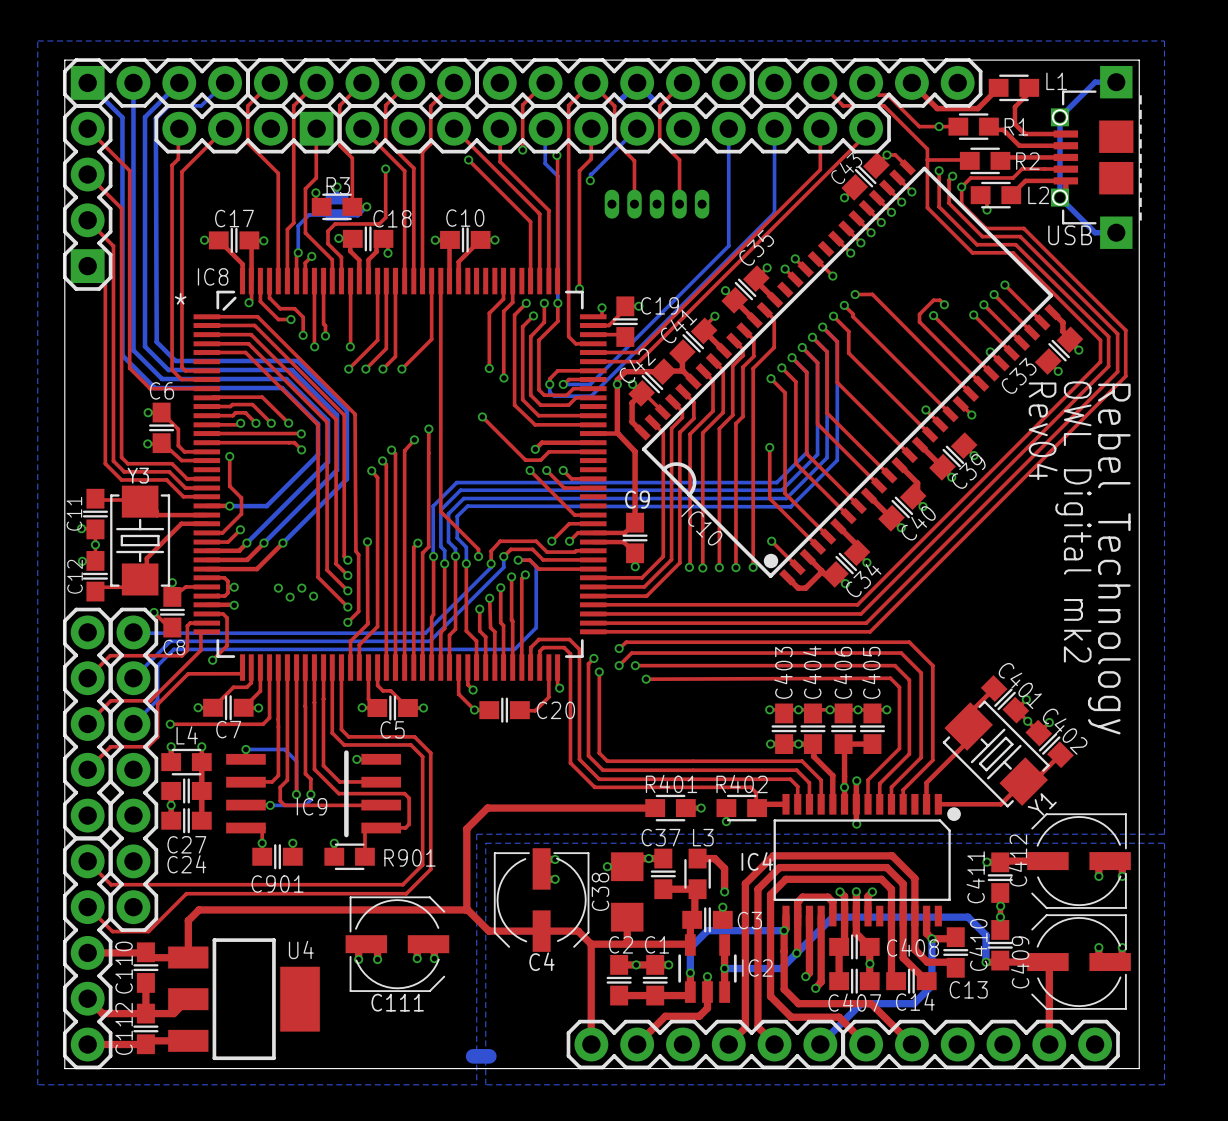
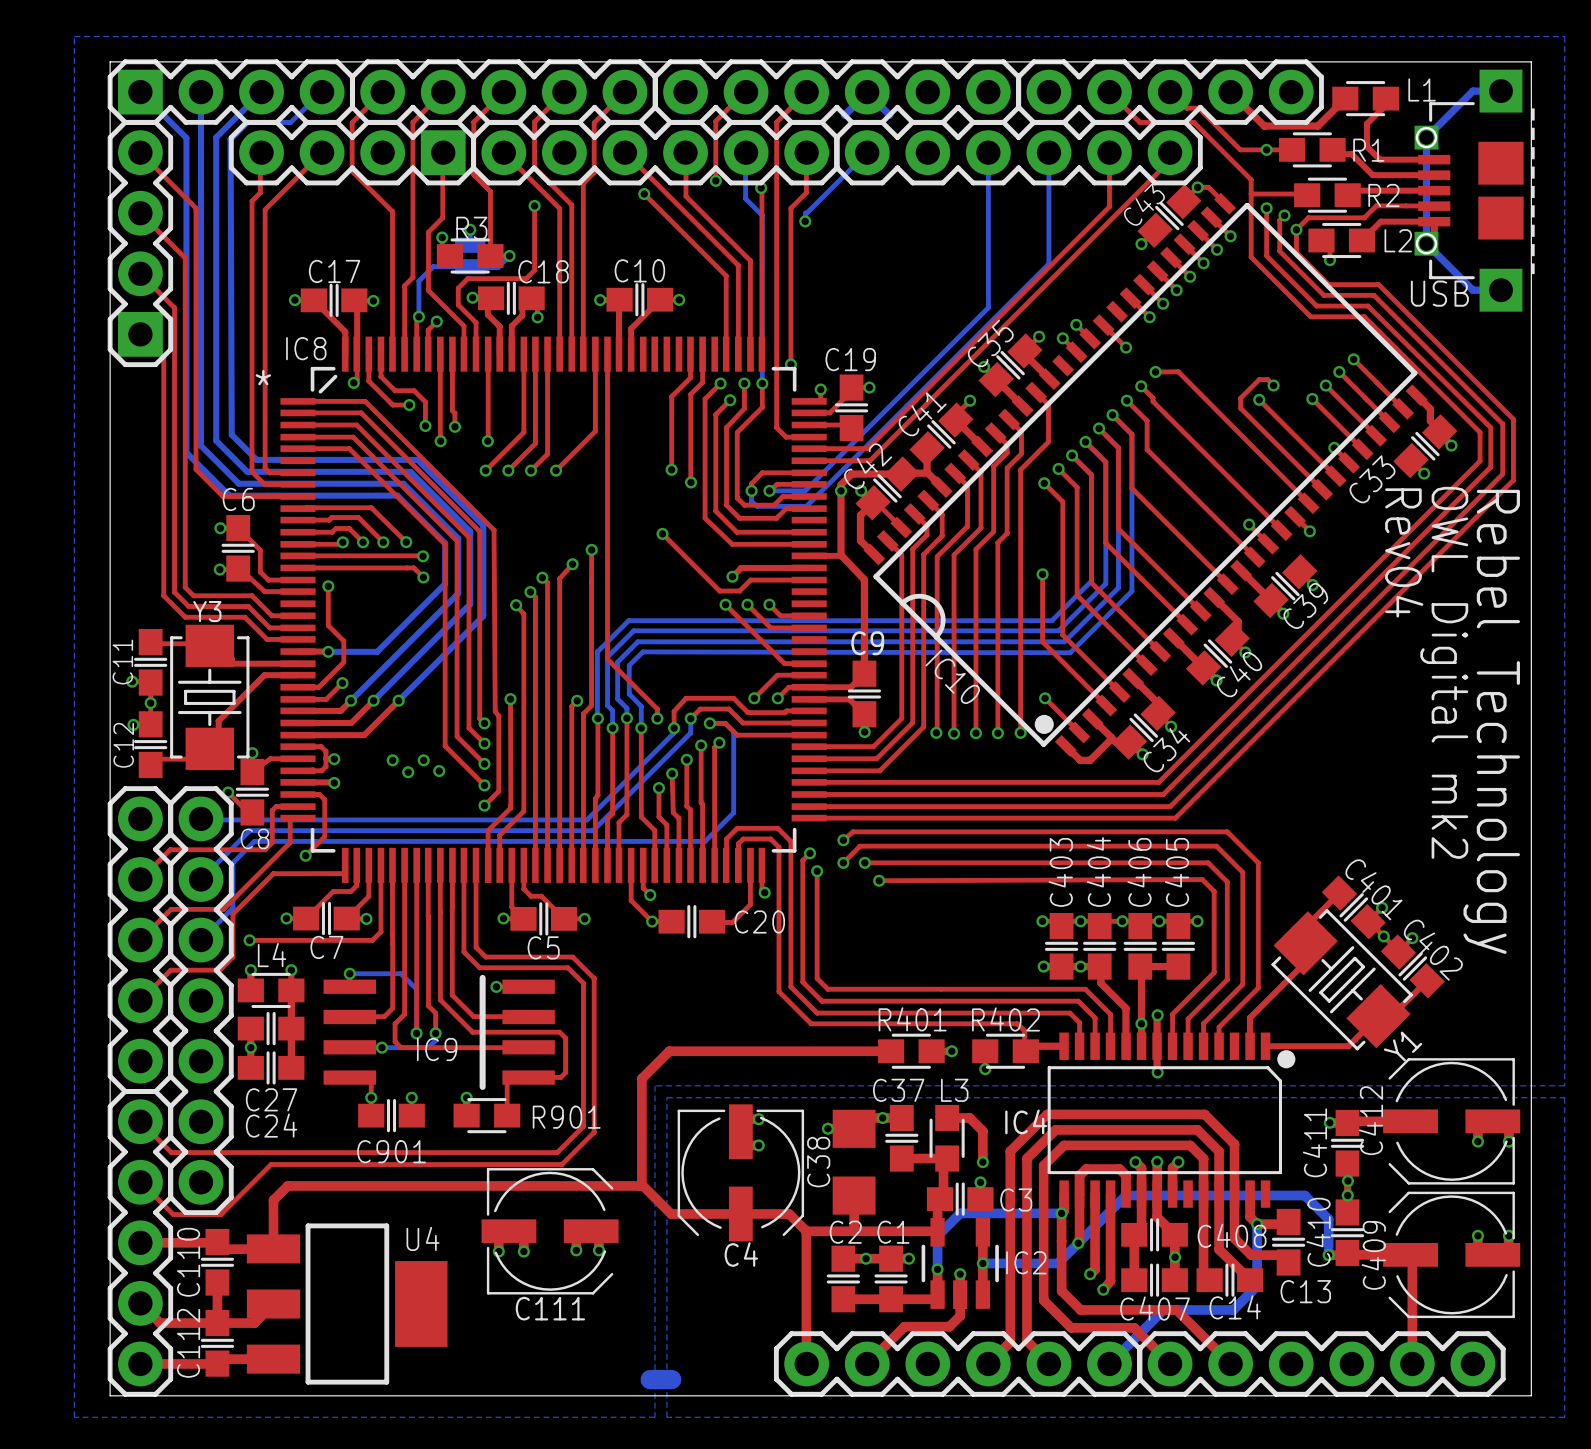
top track: (591, 82) (614, 106) (614, 141) (634, 160) (634, 204) -> none
top track: (682, 82) (659, 106) (659, 140) (679, 159) (679, 204) -> none
part: (657, 204) -> none
C35 name position: C35 (756, 247) -> C35 (990, 343)
C19 name position: C19 (659, 305) -> C19 (850, 359)

